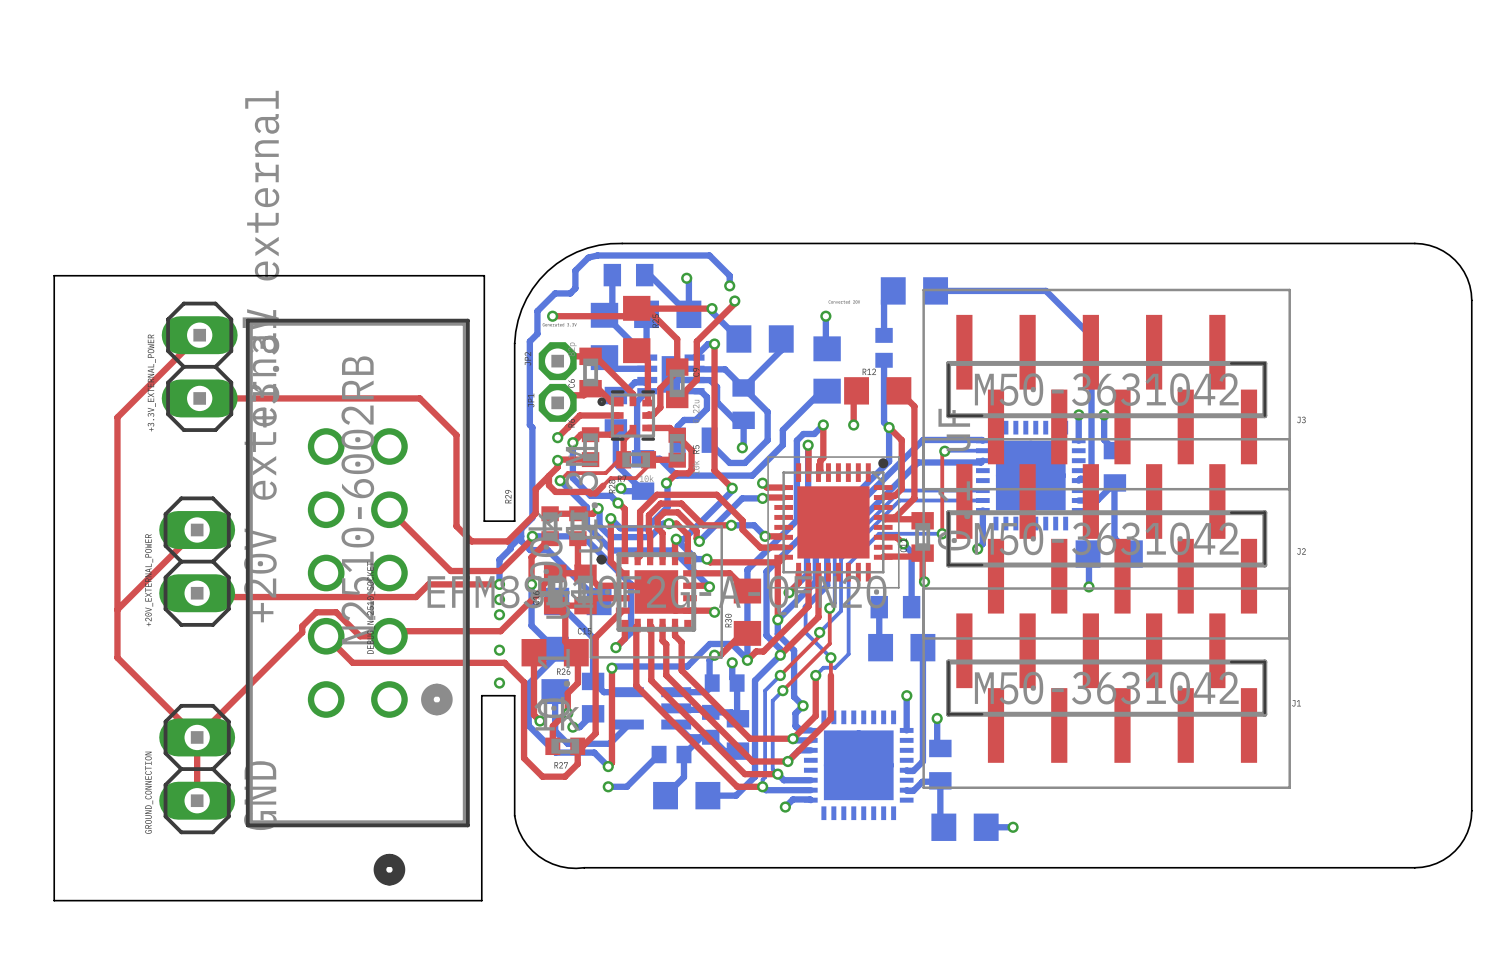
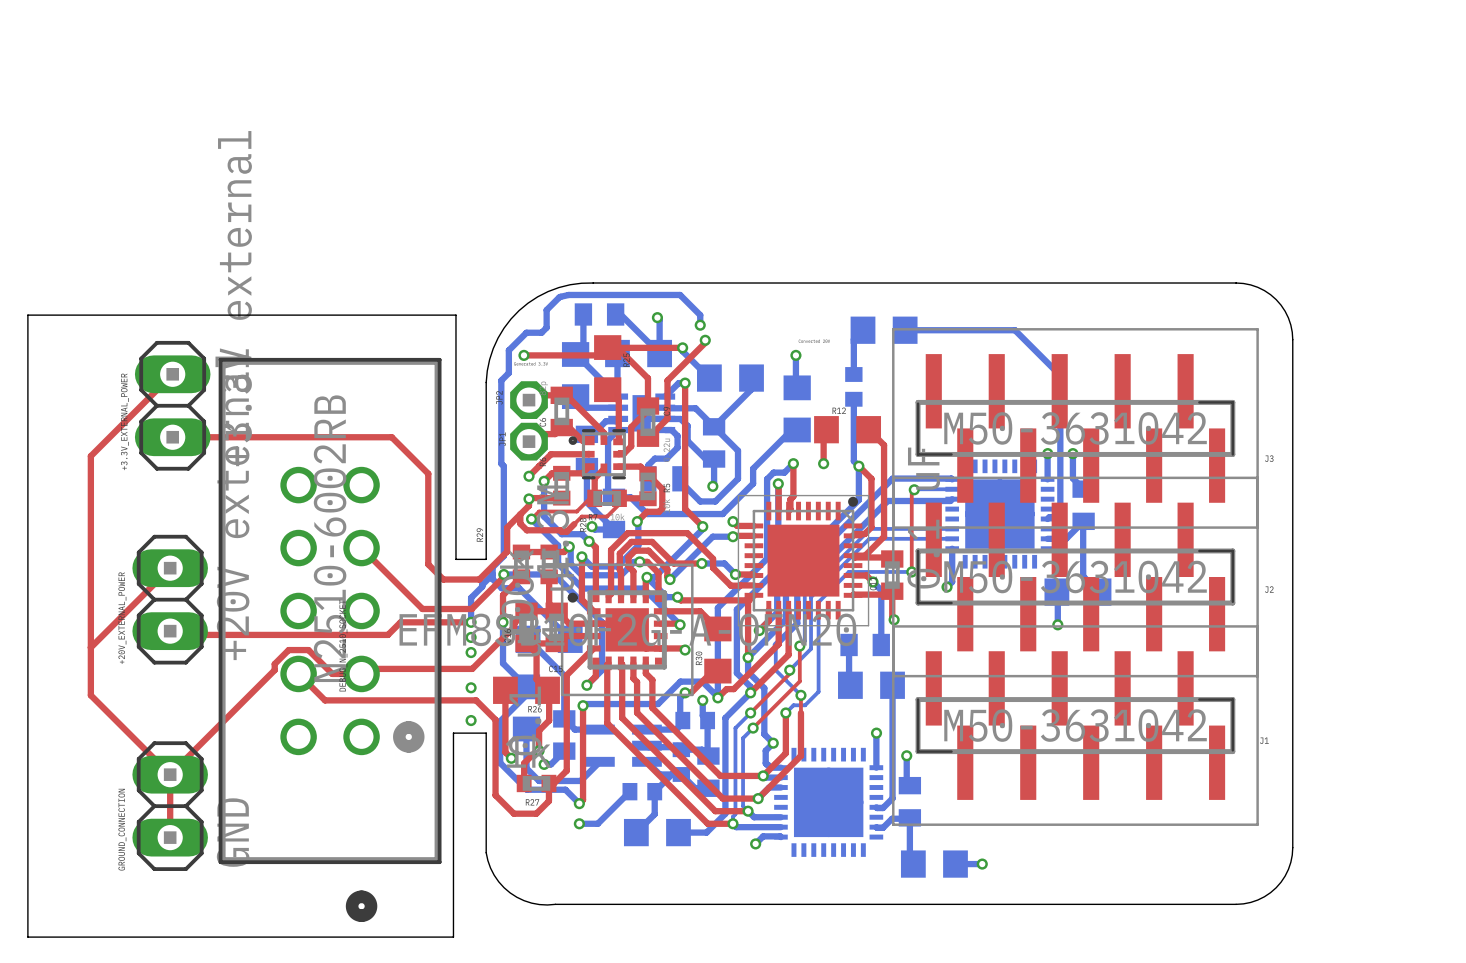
board edge: (1268, 243) (1414, 243) (1429, 245) (1449, 255) (1460, 265) (1467, 278) (1471, 300) (1471, 810) (1467, 832) (1460, 845) (1449, 855) (1436, 863) (1422, 867) (1268, 867) -> (1236, 283) (1257, 287) (1276, 299) (1288, 317) (1292, 339) (1292, 855) (1285, 876) (1270, 892) (1257, 900) (1236, 904)

